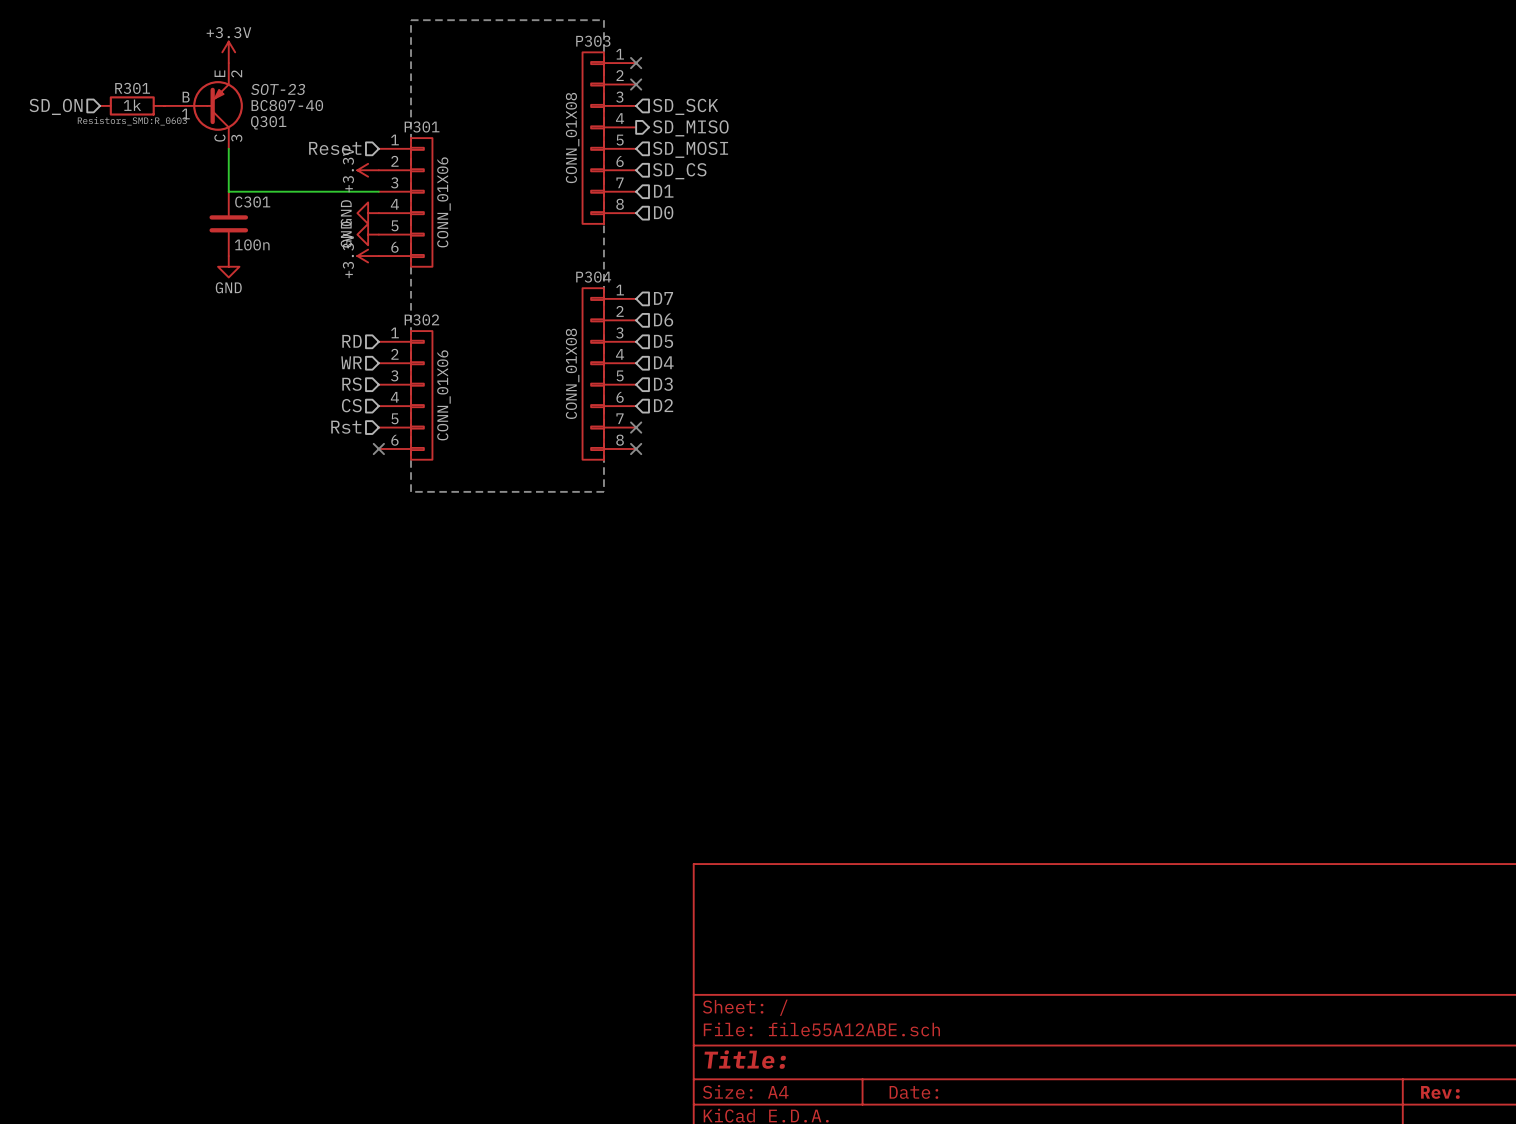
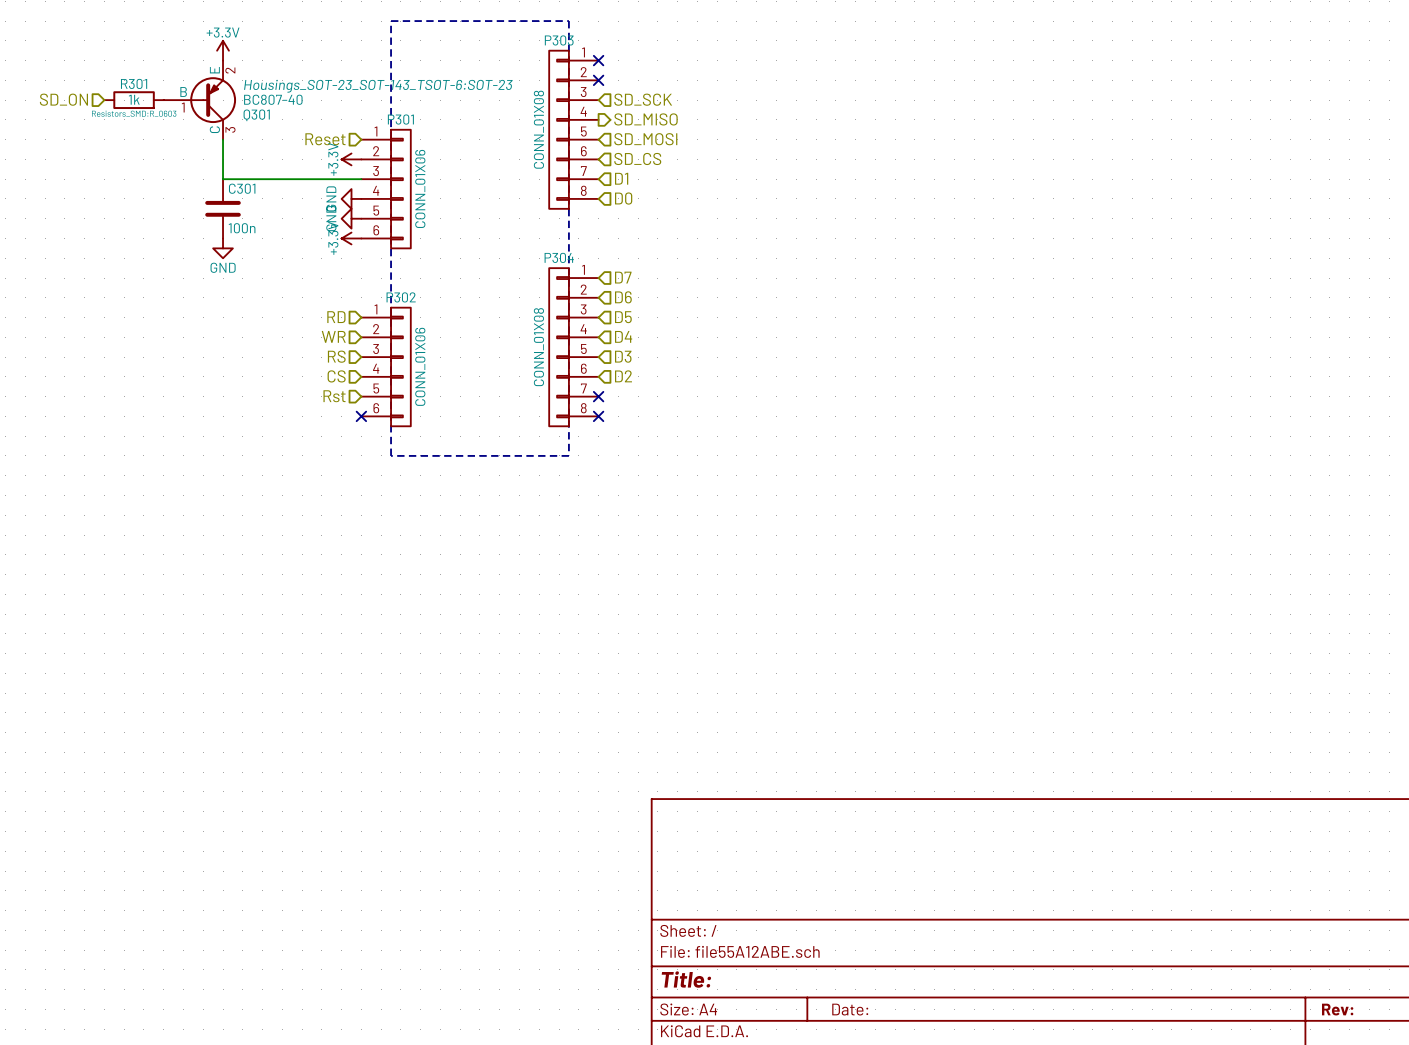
Q301 text: SOT-23 (278, 89) -> Housings_SOT-23_SOT-143_TSOT-6:SOT-23 (378, 86)

